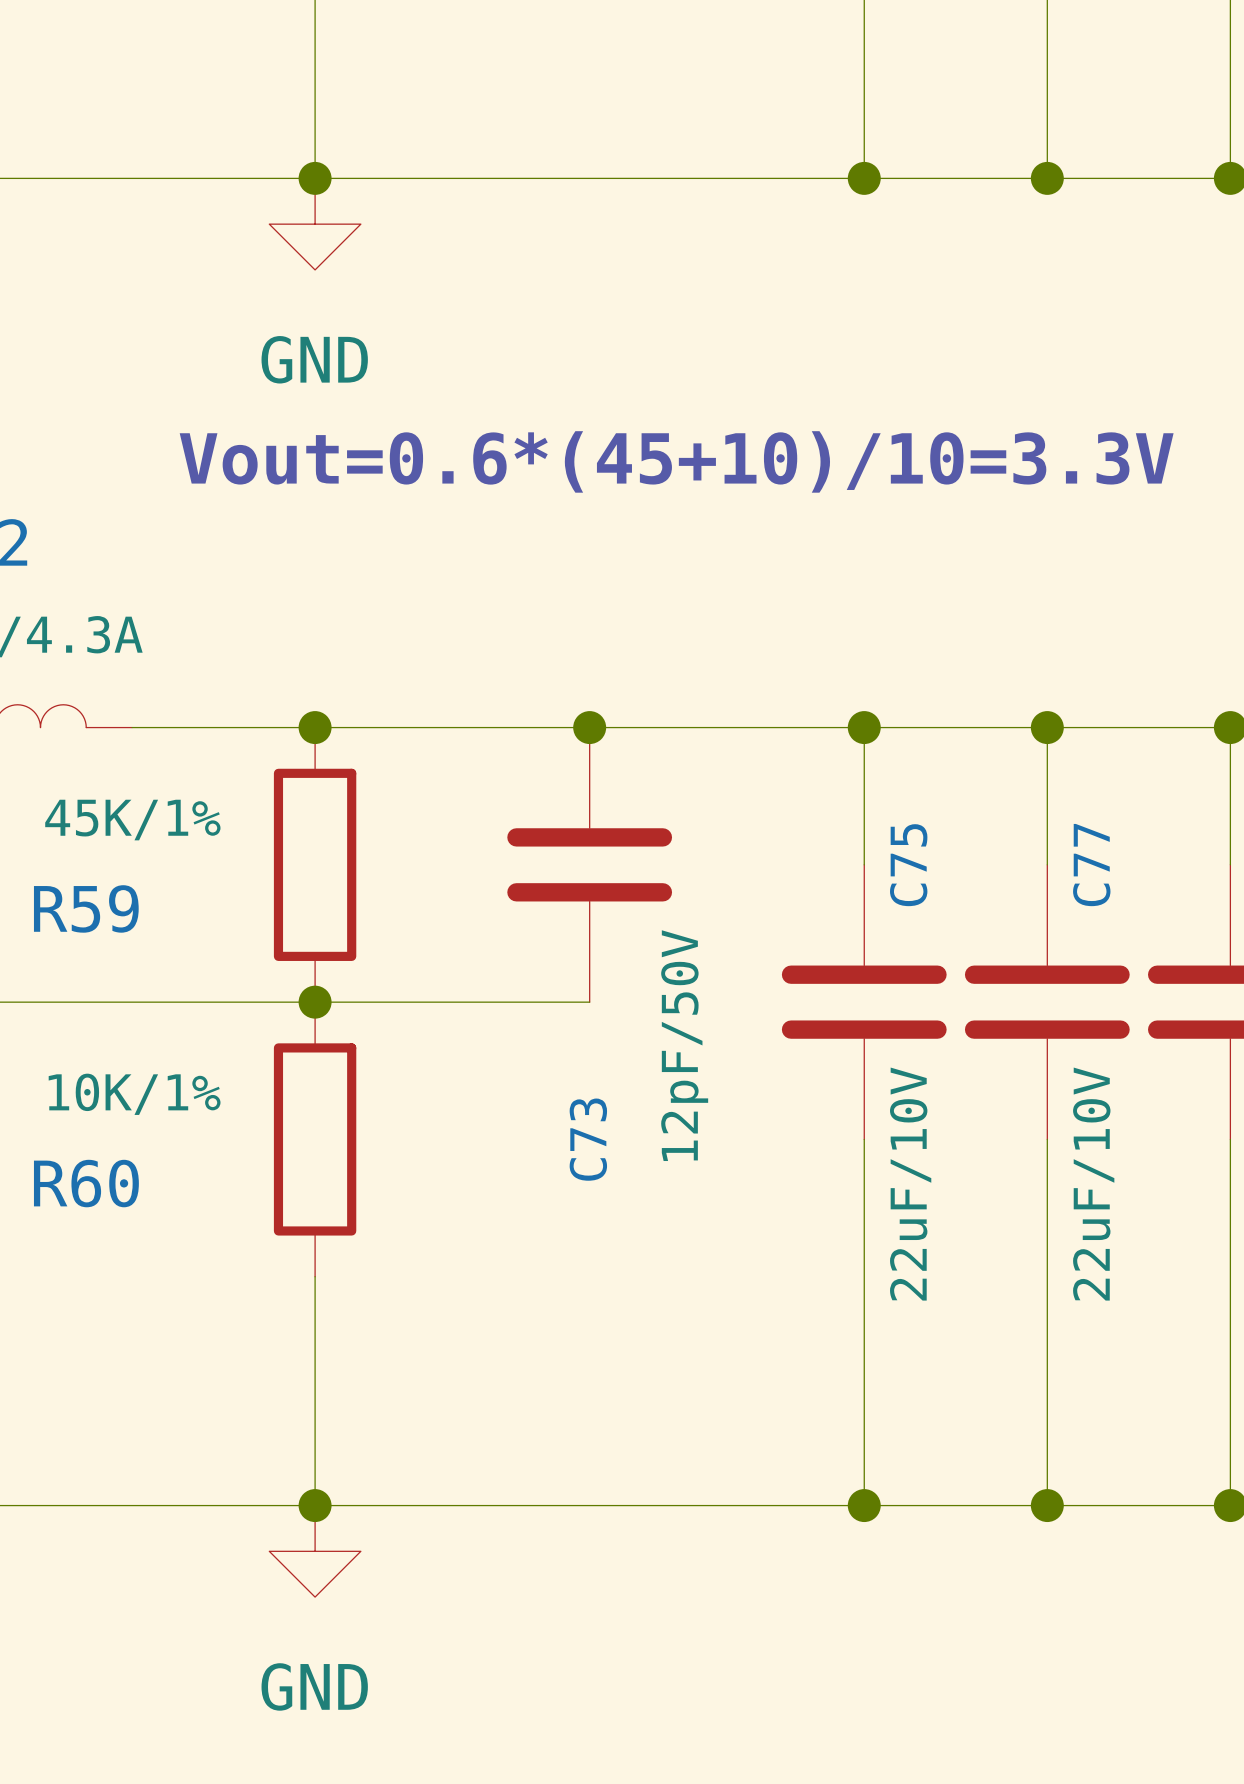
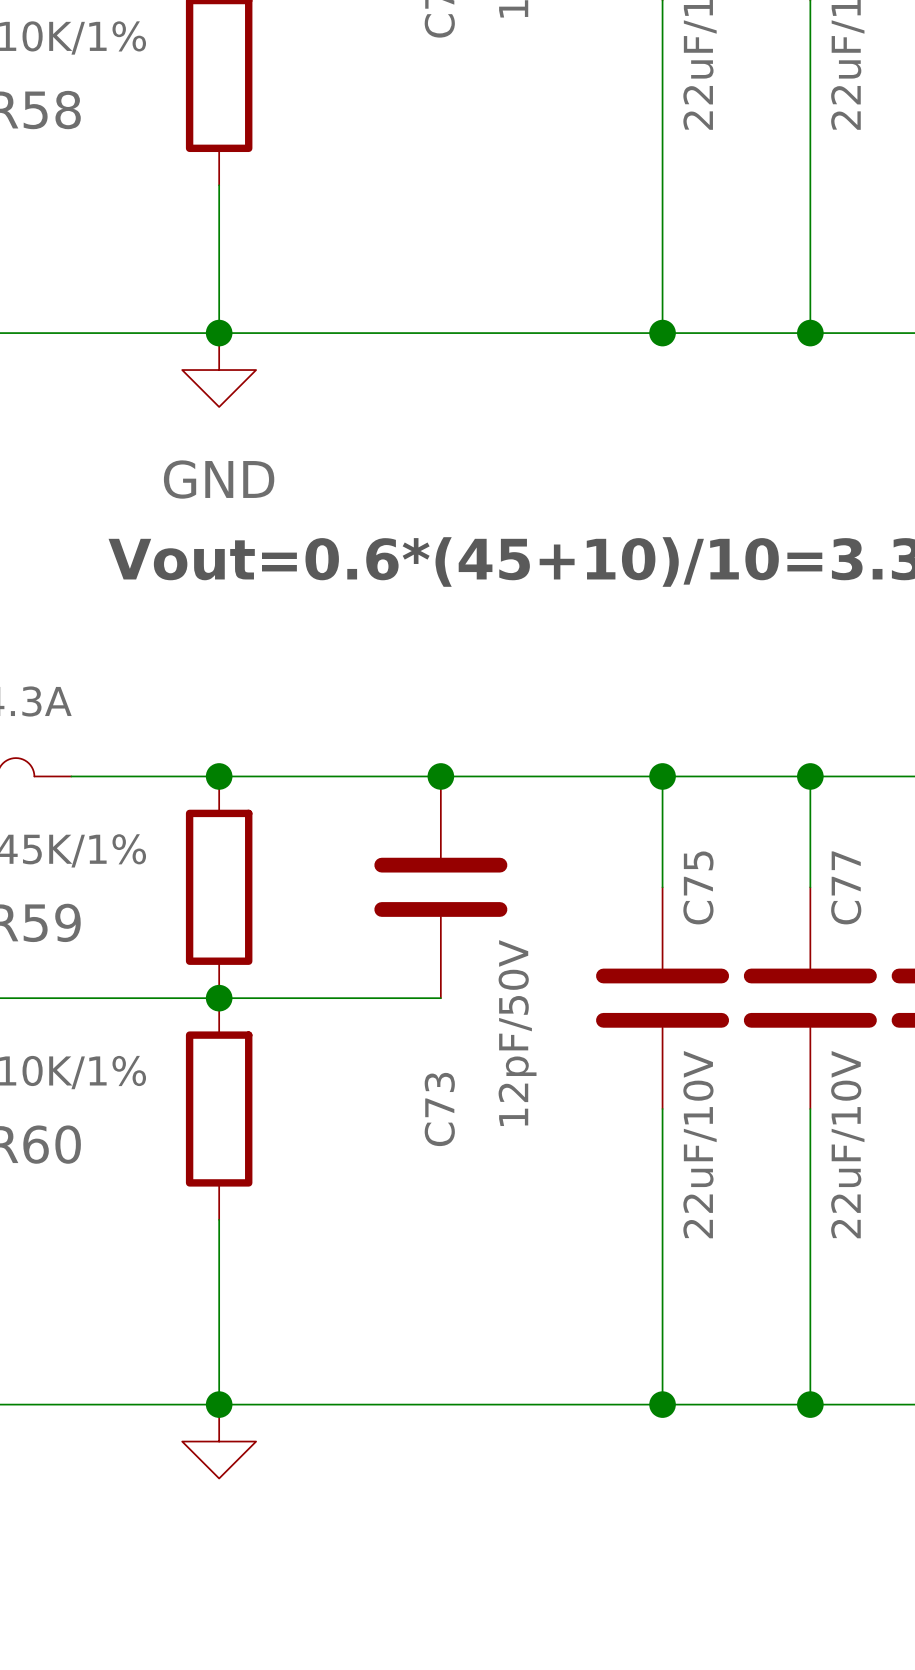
power symbol text: GND (314, 1686) -> none

